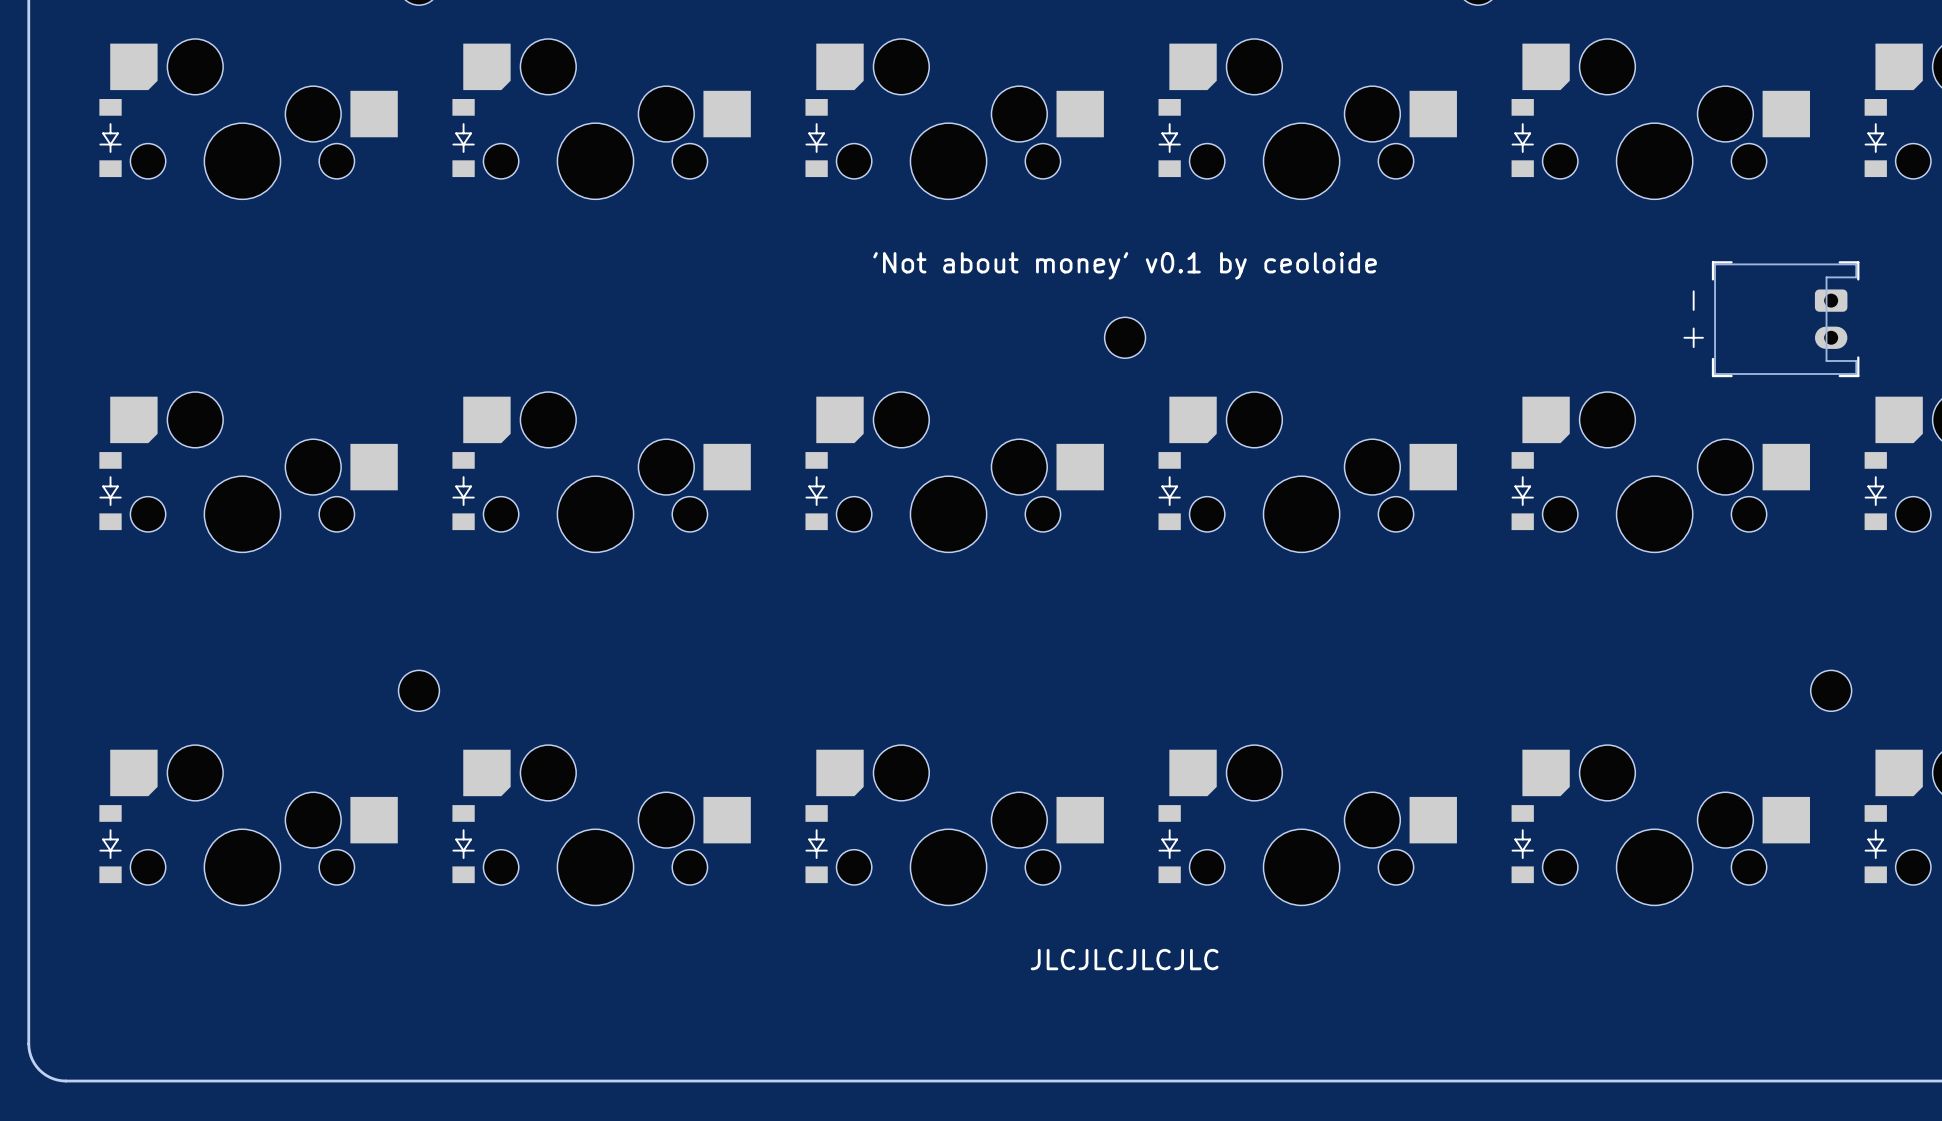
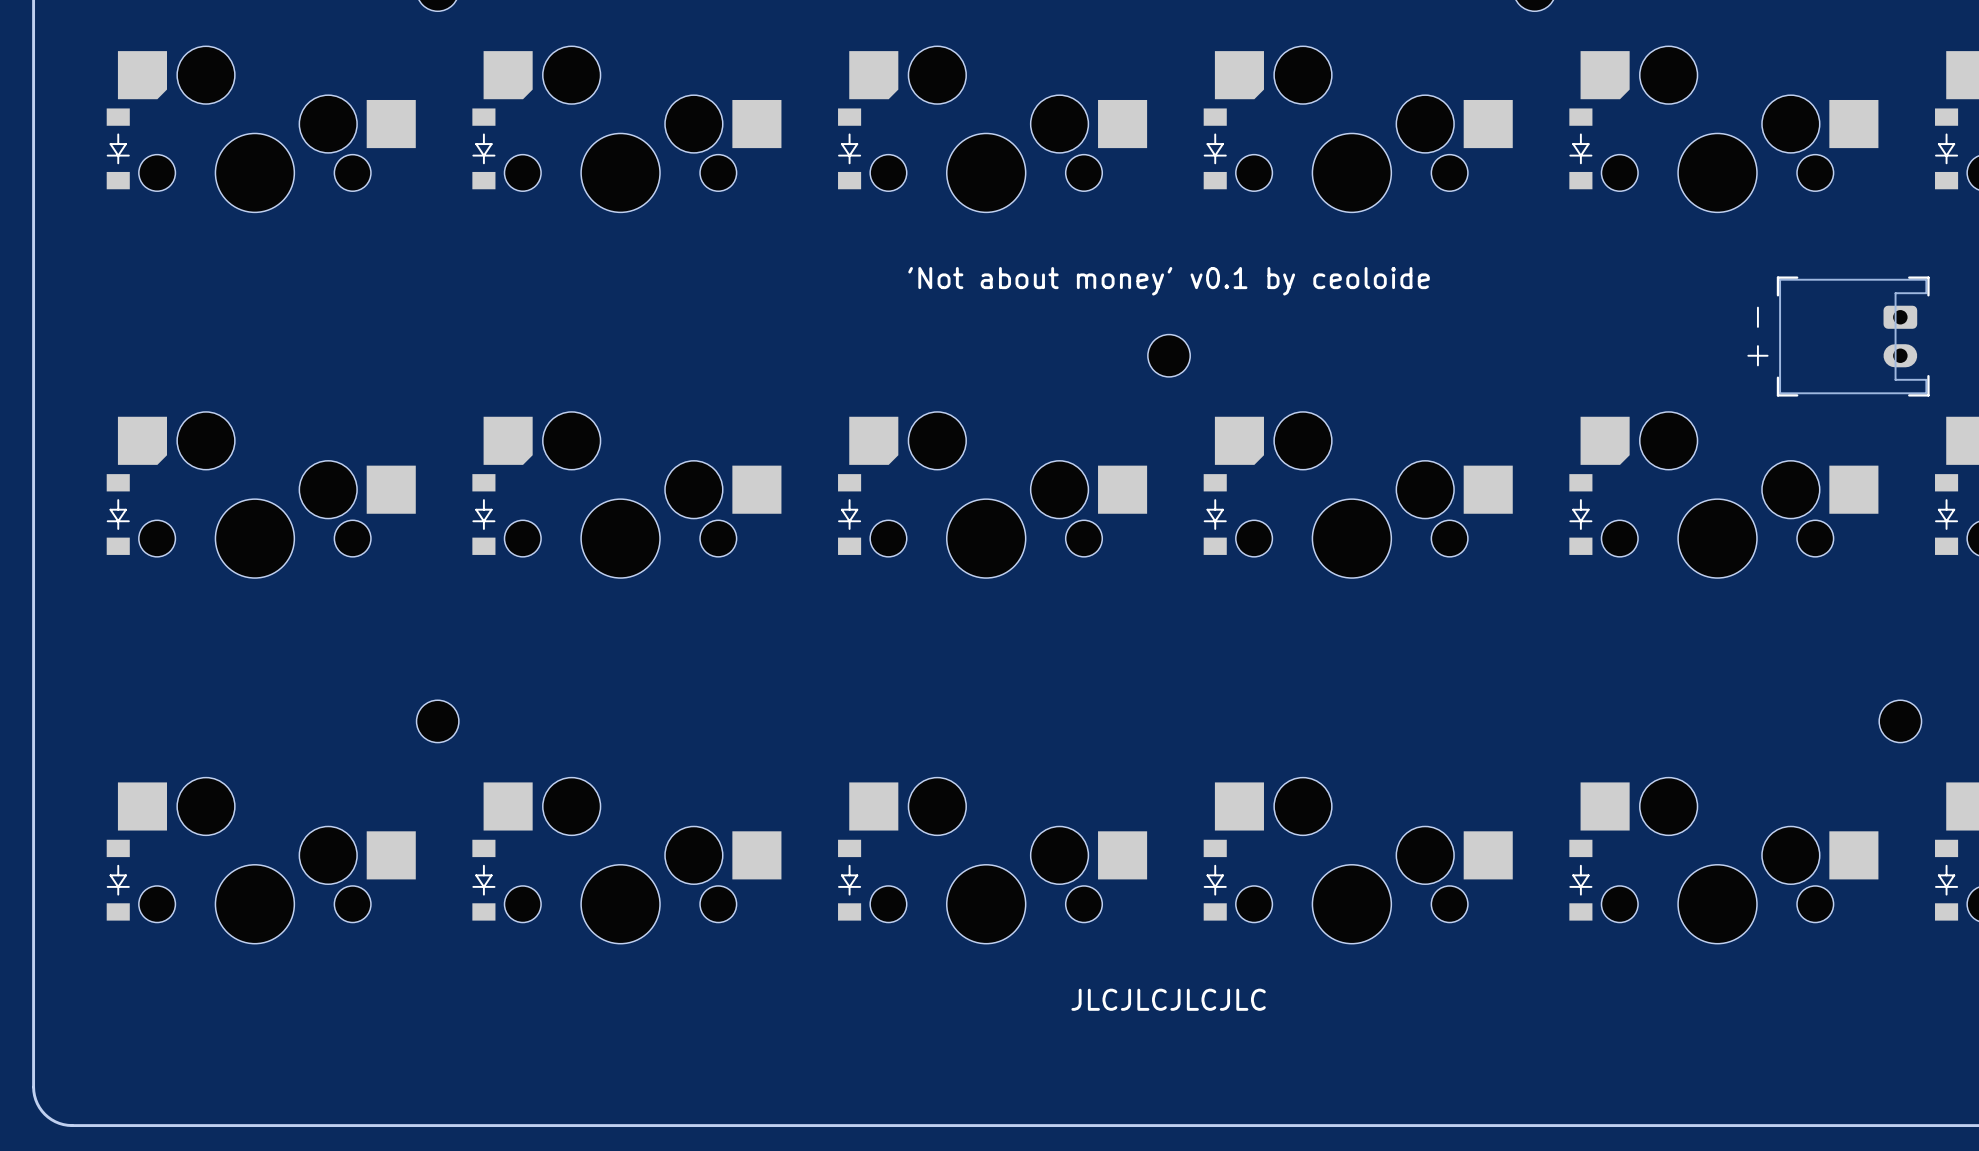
part footprint: [110, 745, 398, 906] -> [117, 777, 416, 944]
part footprint: [463, 745, 751, 906] -> [483, 777, 782, 944]
part footprint: [816, 745, 1104, 906] -> [849, 777, 1148, 944]
part footprint: [1169, 745, 1457, 906] -> [1214, 777, 1513, 944]
part footprint: [1522, 745, 1810, 906] -> [1580, 777, 1879, 944]

